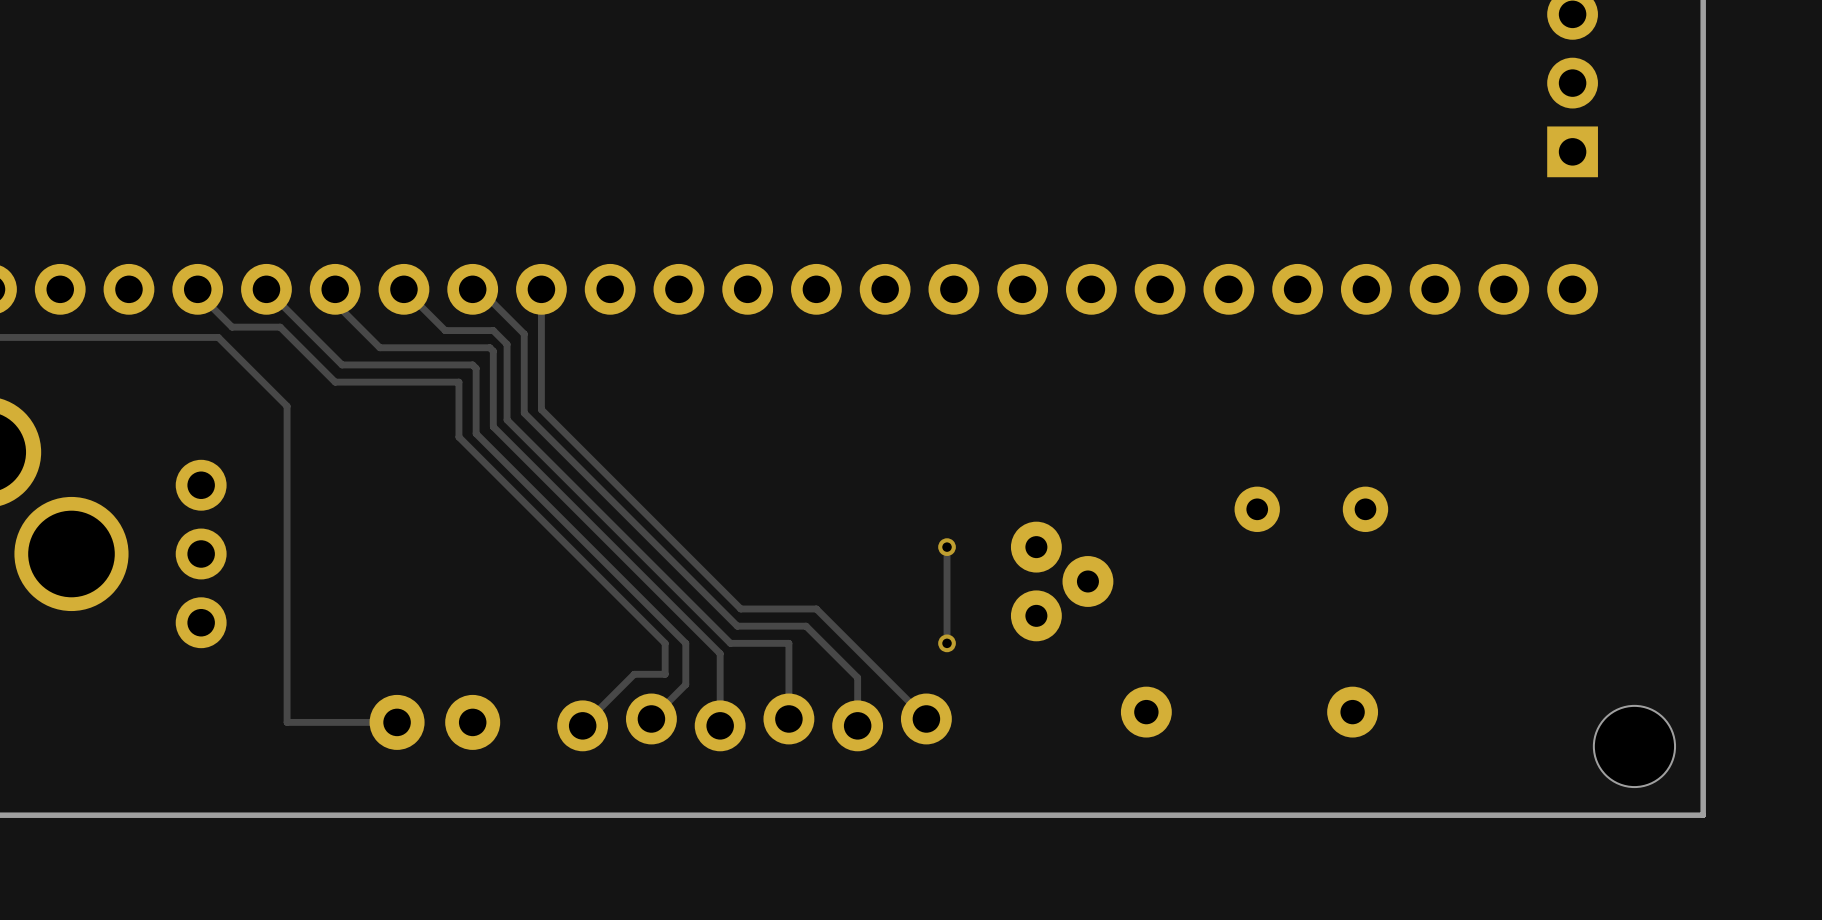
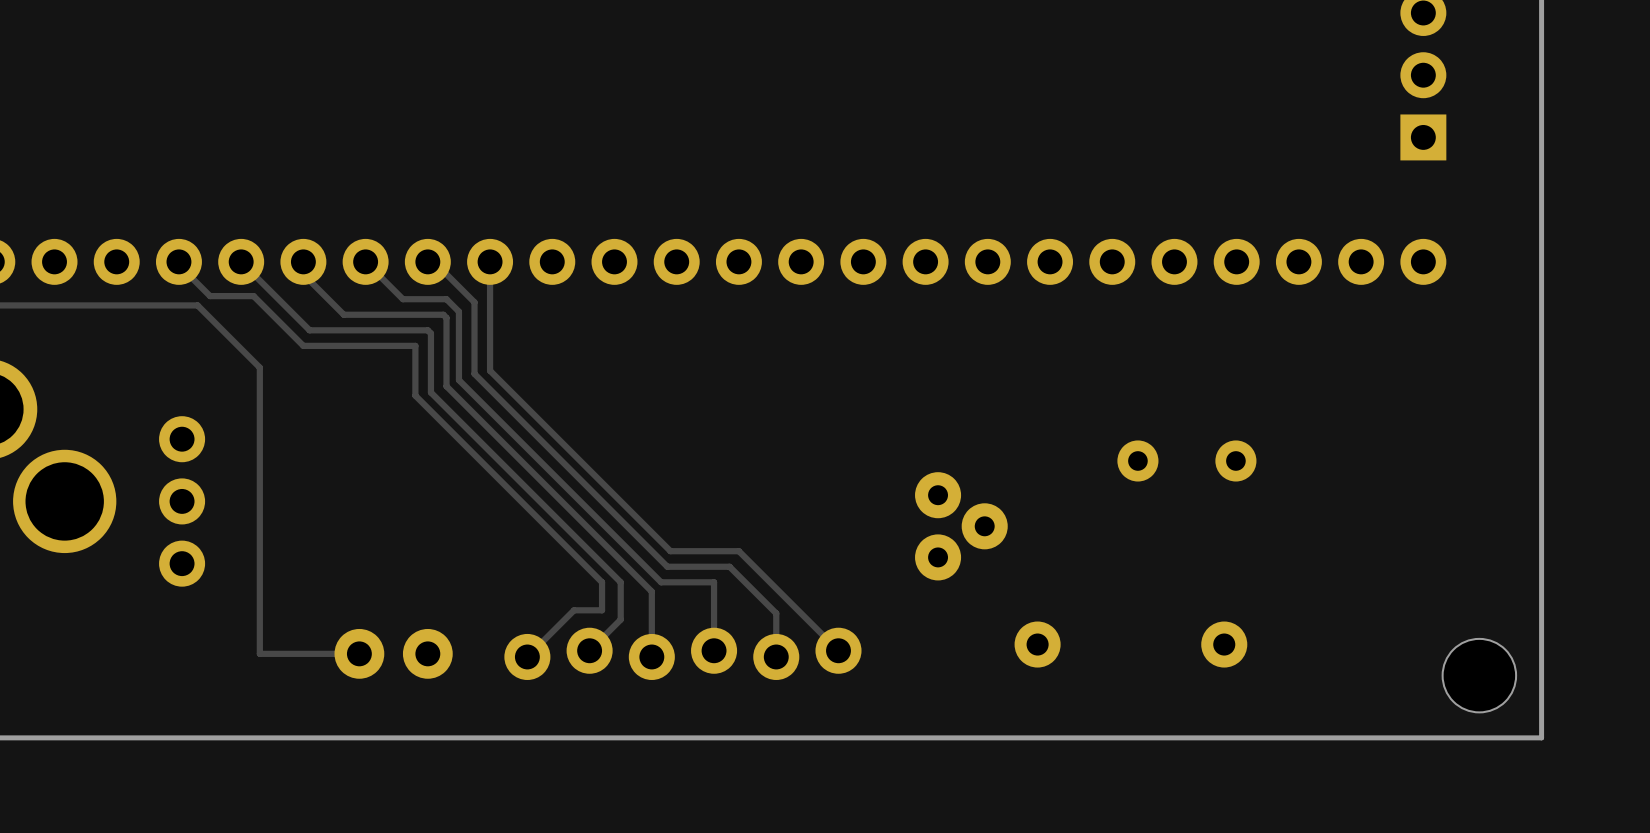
track: (947, 547) (947, 643) -> none
via: (947, 547) -> none
via: (947, 643) -> none

